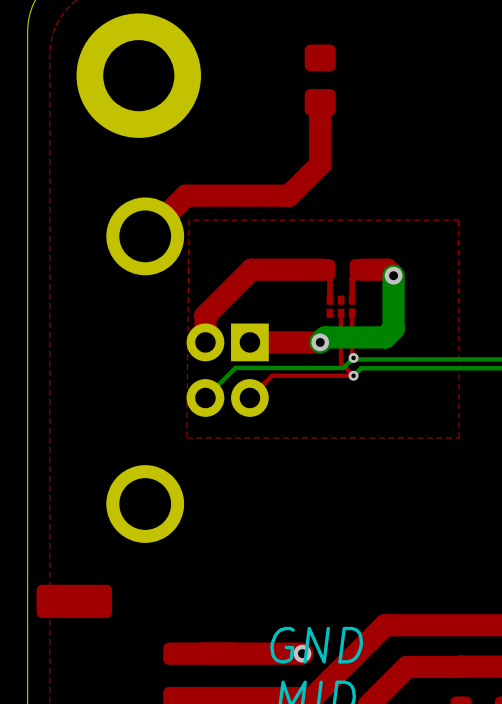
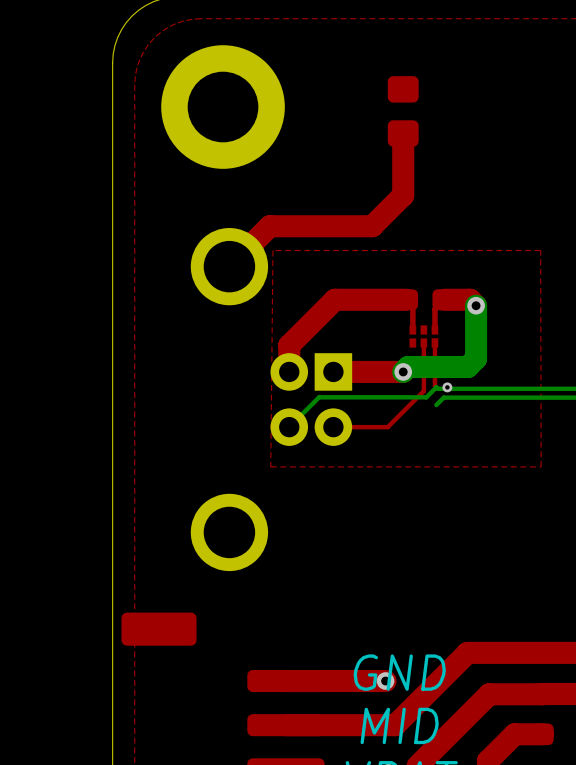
via: (353, 357) -> none
via: none -> (447, 387)
top track: (341, 361) (353, 375) (272, 375) (256, 391) -> (423, 390) (387, 427) (333, 427)
via: (353, 375) -> none

